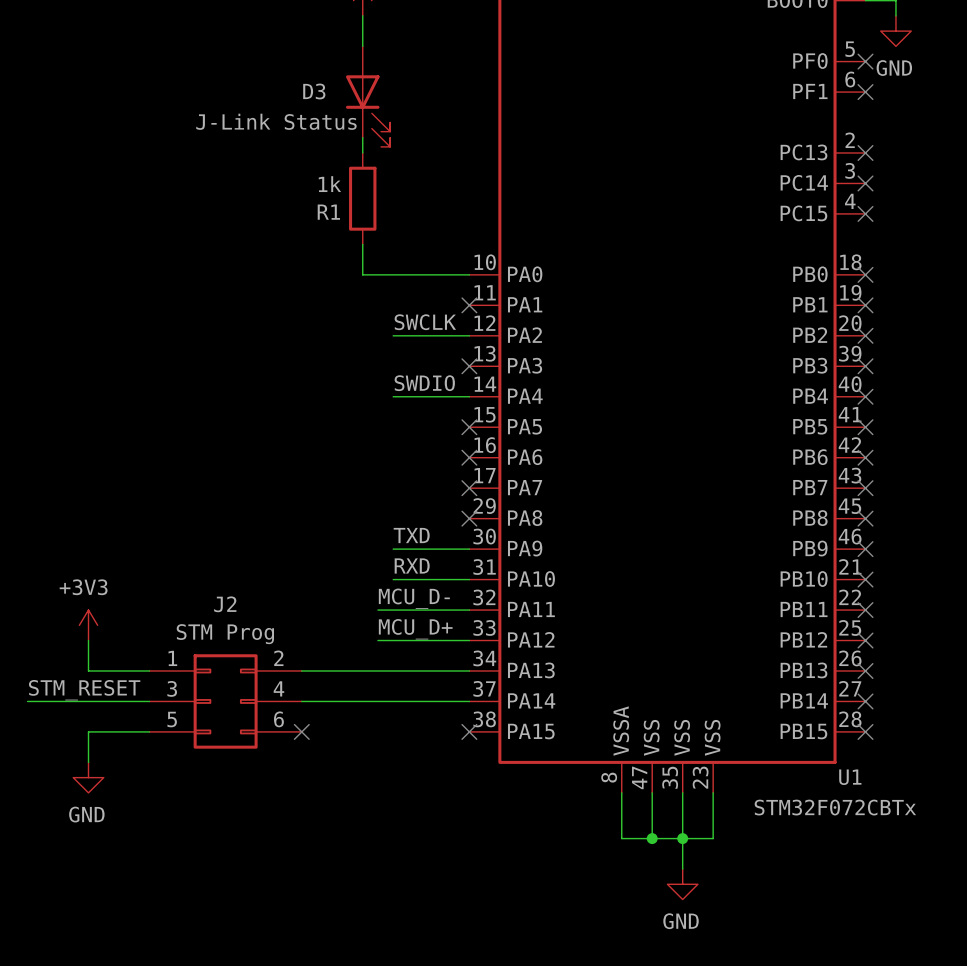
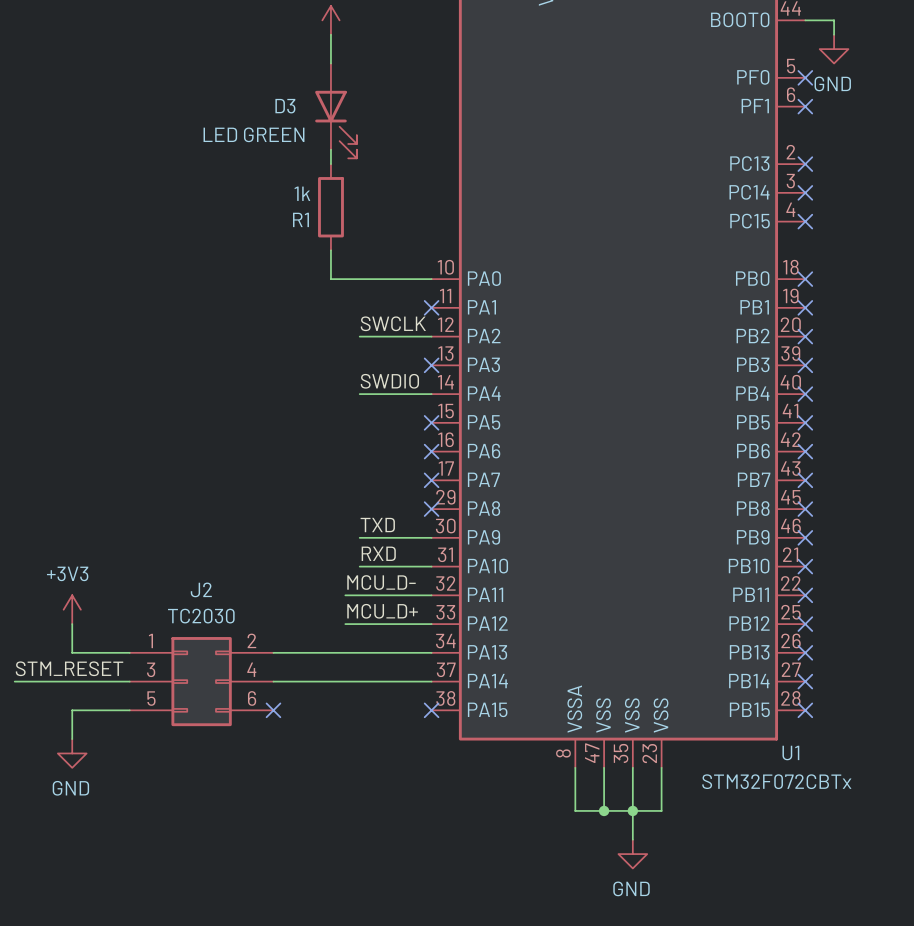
D3 value: J-Link Status (276, 121) -> LED GREEN (253, 134)
J2 value: STM Prog (225, 634) -> TC2030 (201, 616)

